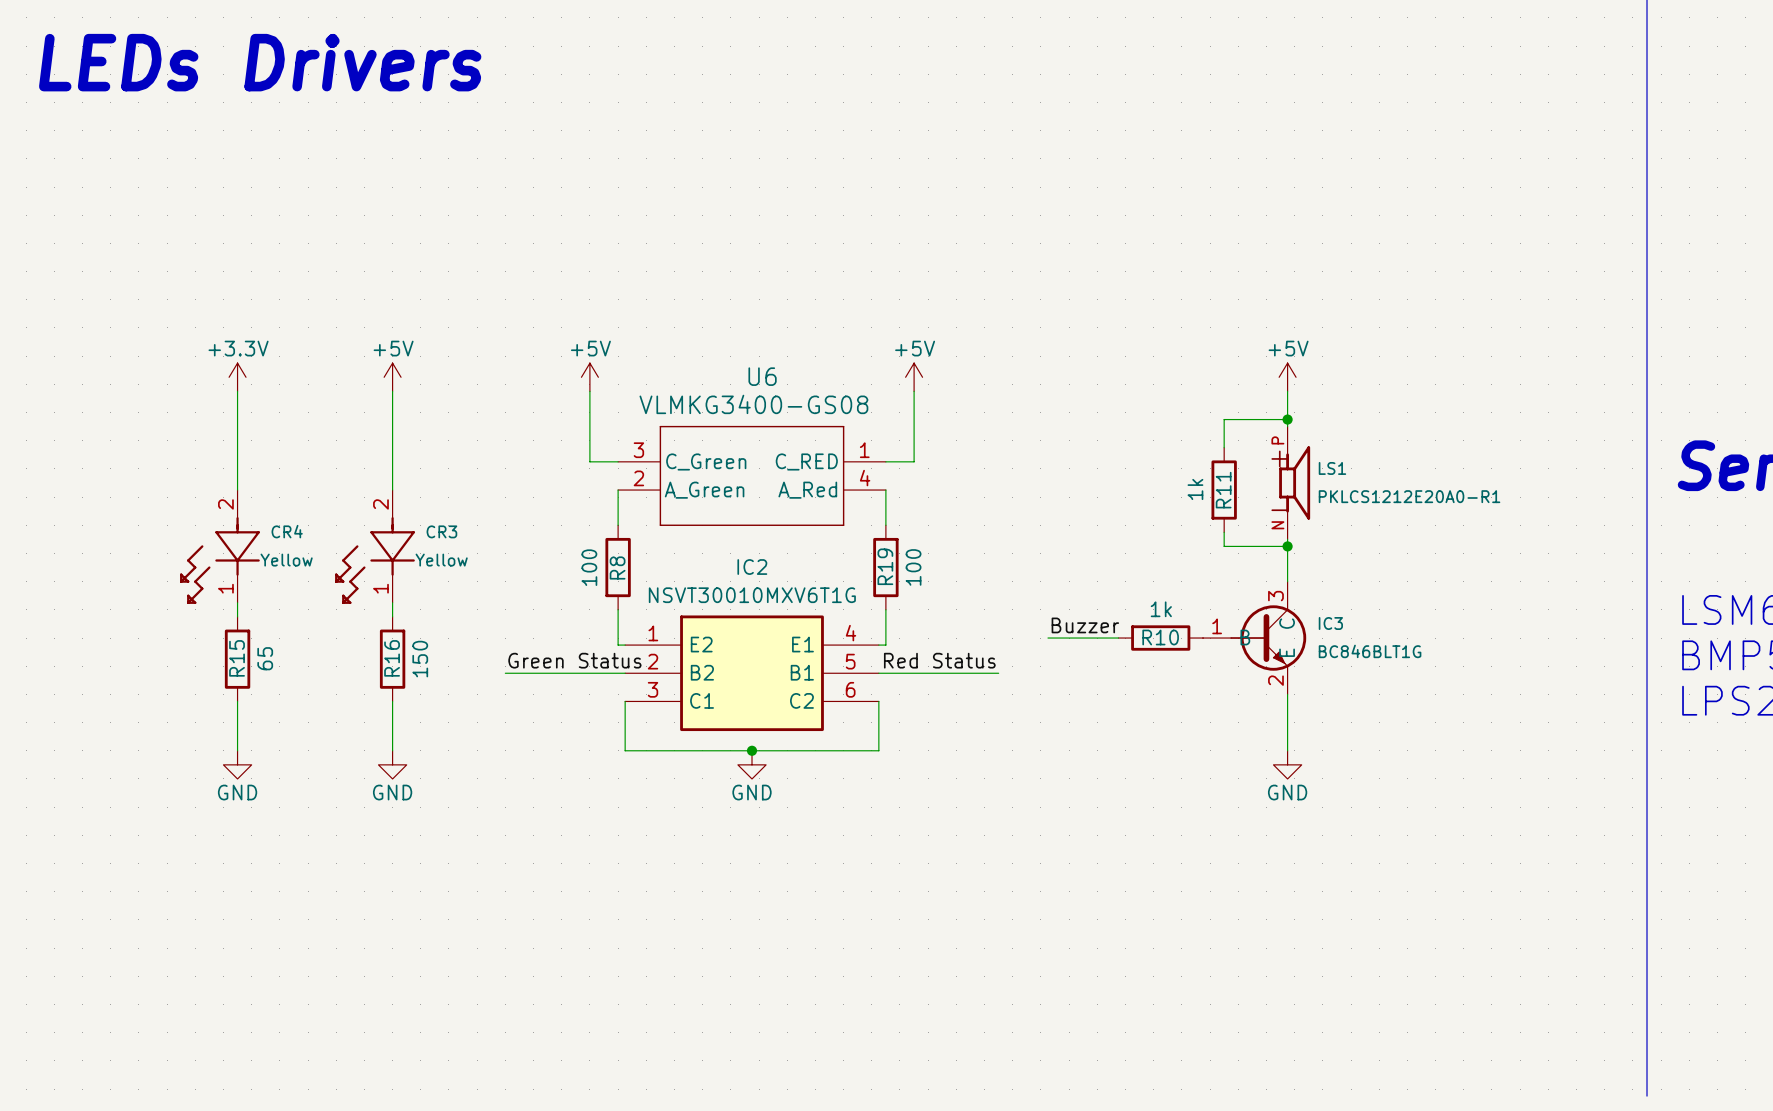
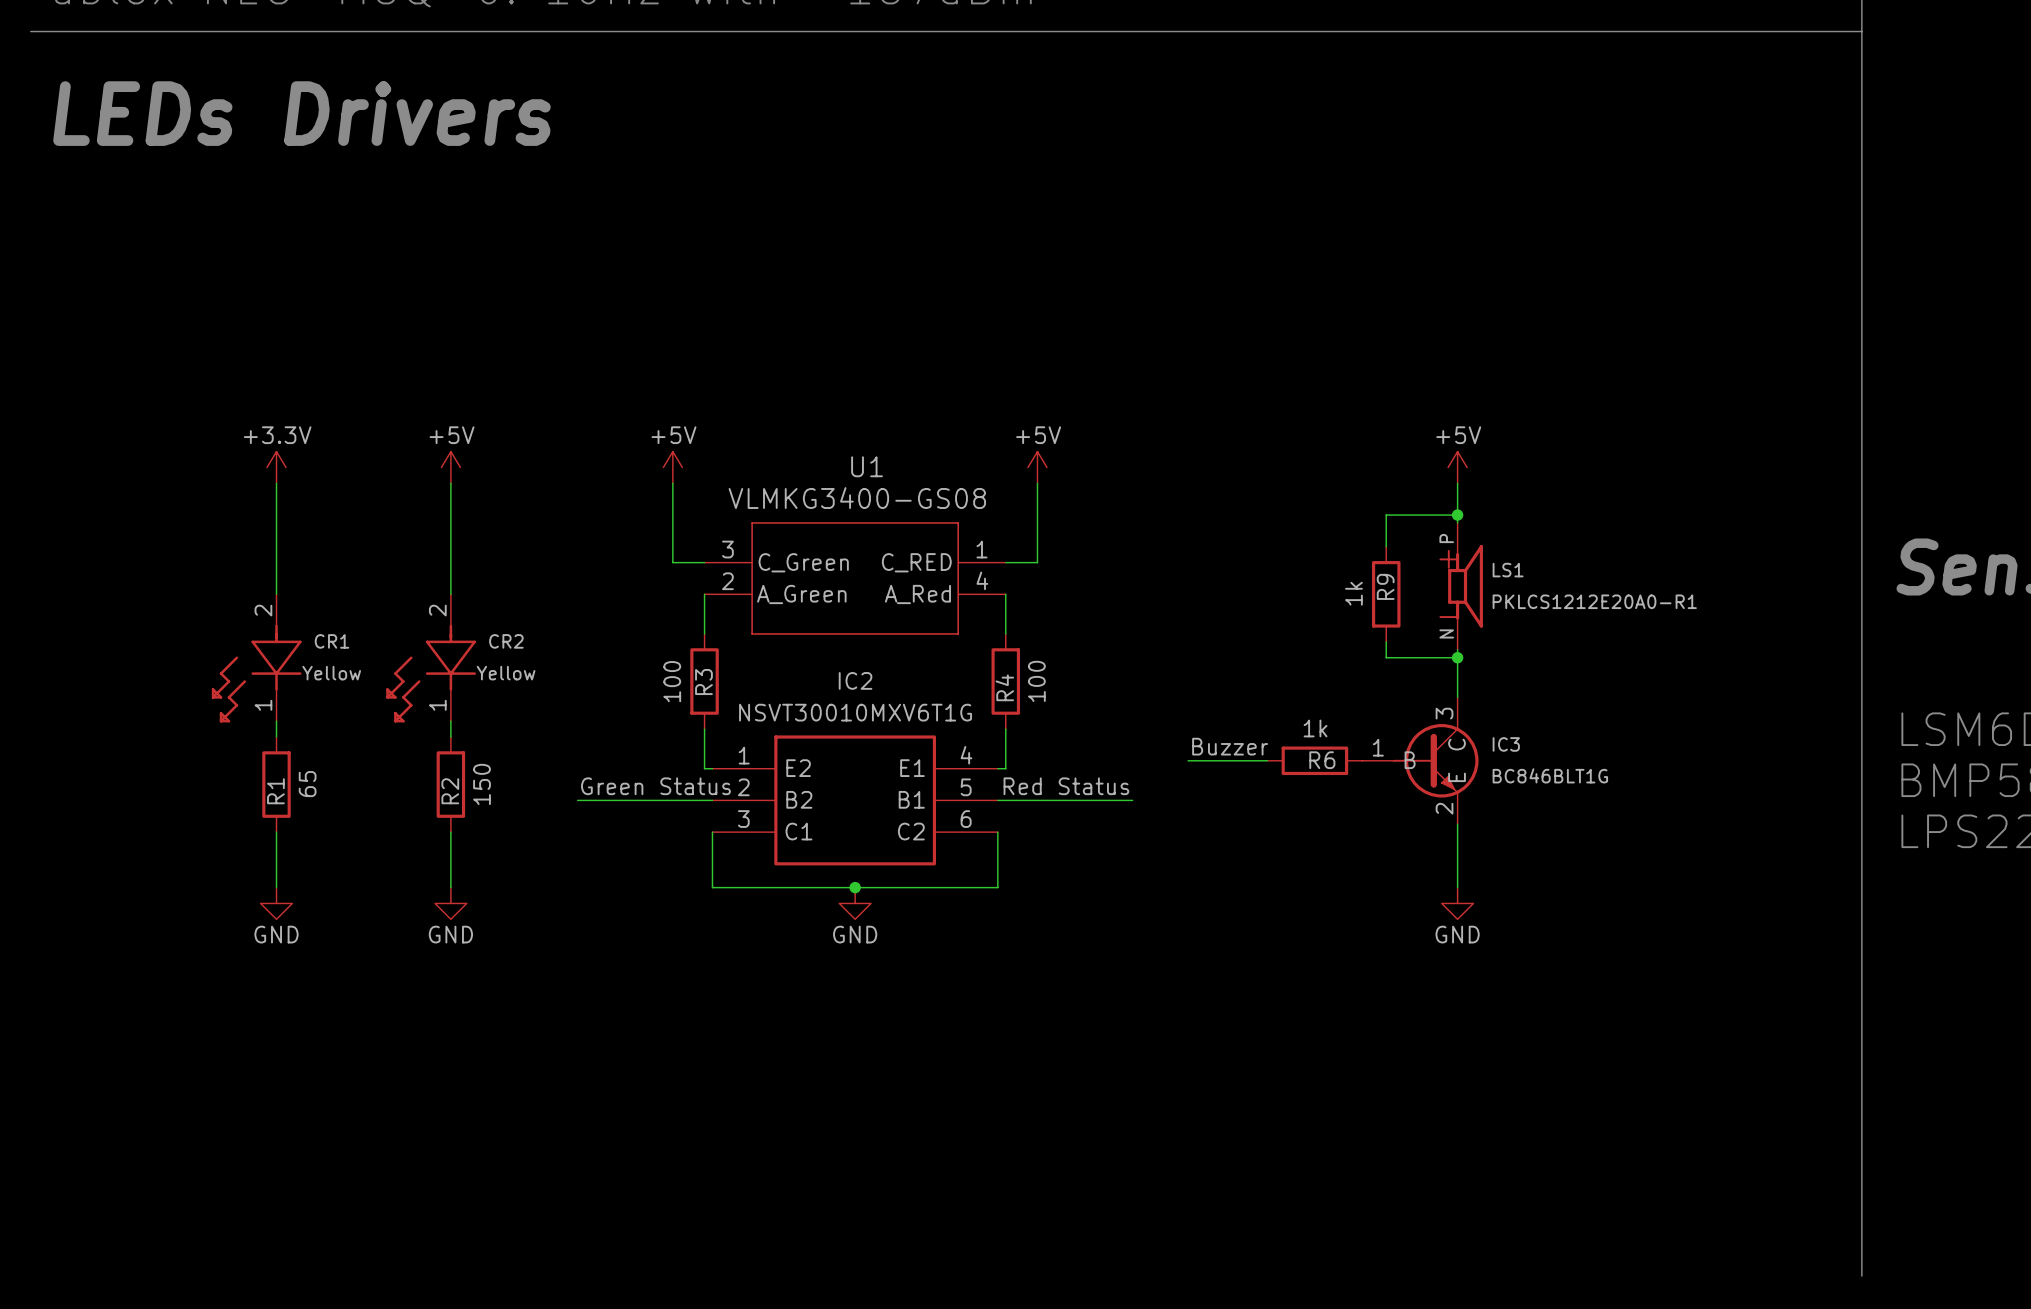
U6 name: U6 (762, 376) -> U1 (867, 466)
R11 name: R11 (1223, 490) -> R9 (1385, 586)
CR4 name: CR4 (287, 531) -> CR1 (331, 641)
CR3 name: CR3 (441, 531) -> CR2 (506, 641)
R19 name: R19 (885, 566) -> R4 (1004, 687)
R8 name: R8 (617, 567) -> R3 (703, 682)
R10 name: R10 (1160, 637) -> R6 (1322, 760)
R15 name: R15 (237, 658) -> R1 (275, 791)
R16 name: R16 (392, 658) -> R2 (450, 791)

